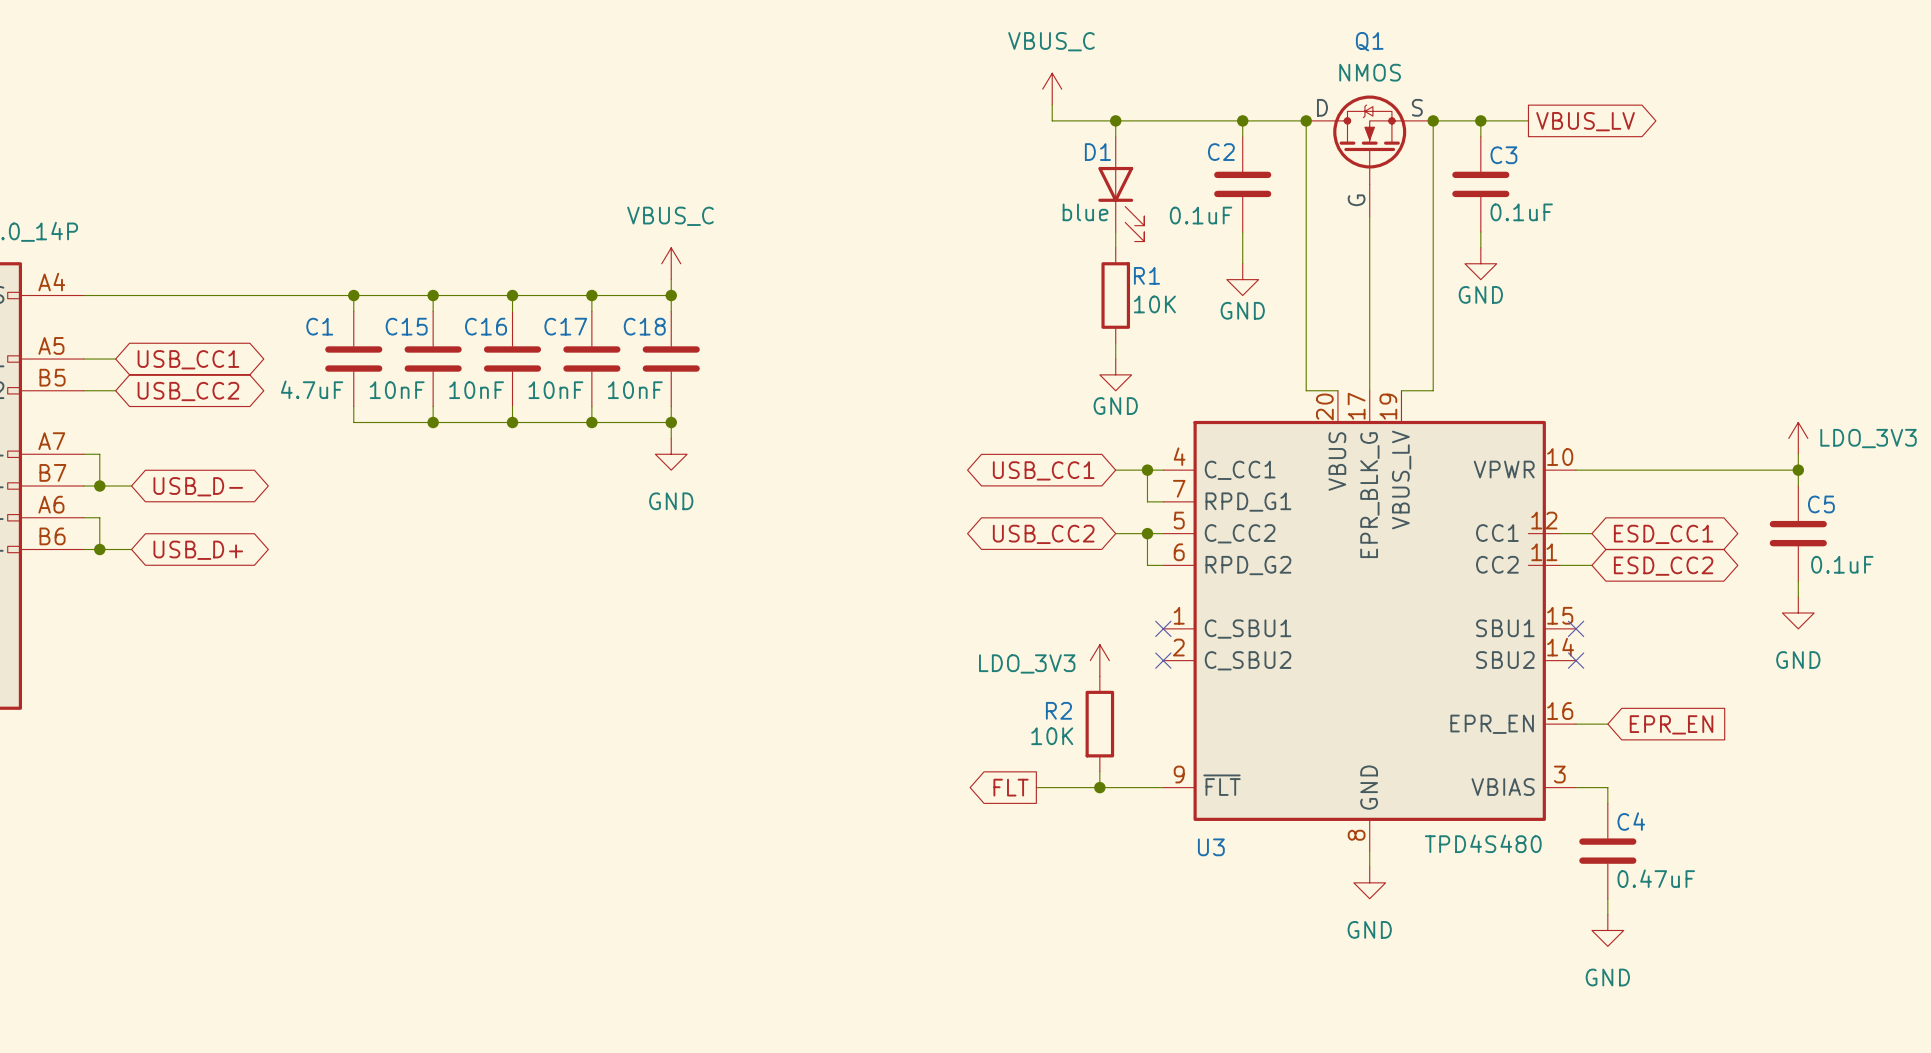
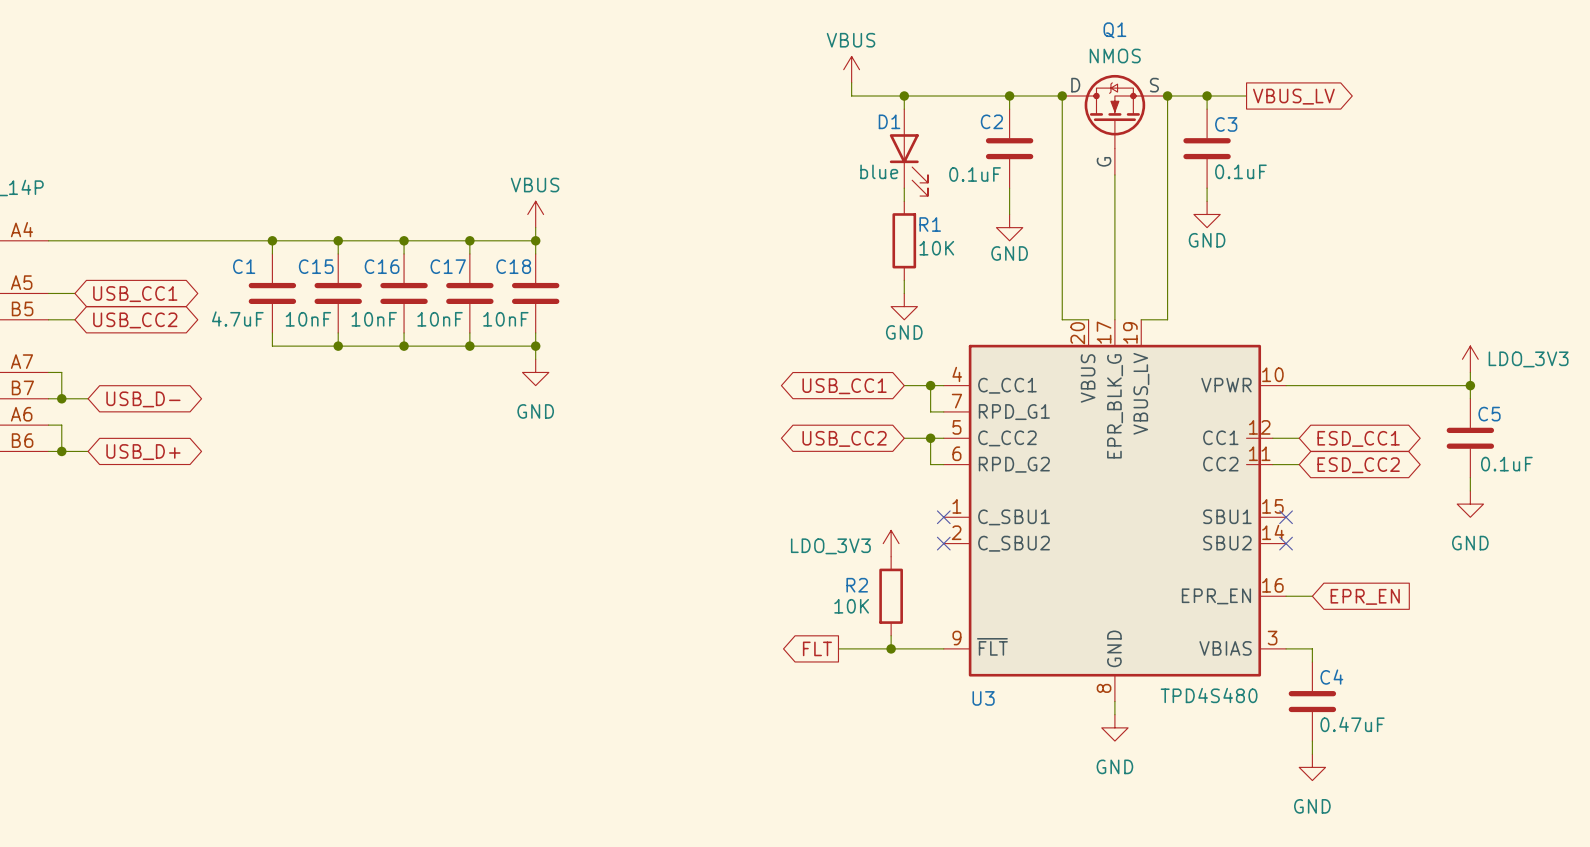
power symbol: VBUS_C (1052, 89) -> VBUS (851, 69)
power symbol: VBUS_C (671, 263) -> VBUS (535, 214)

